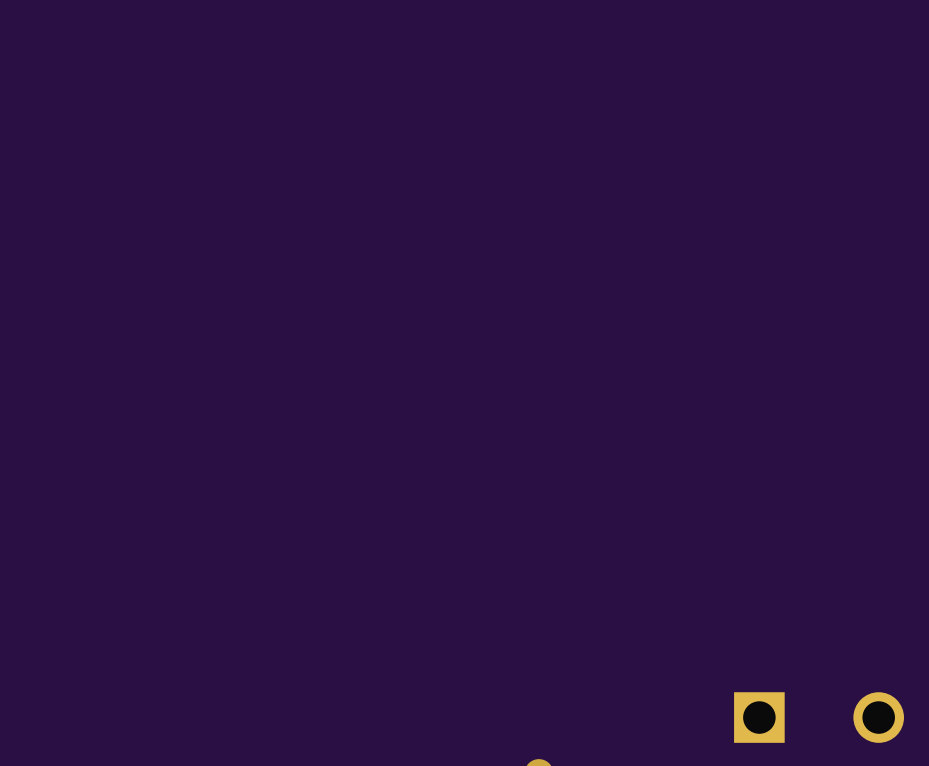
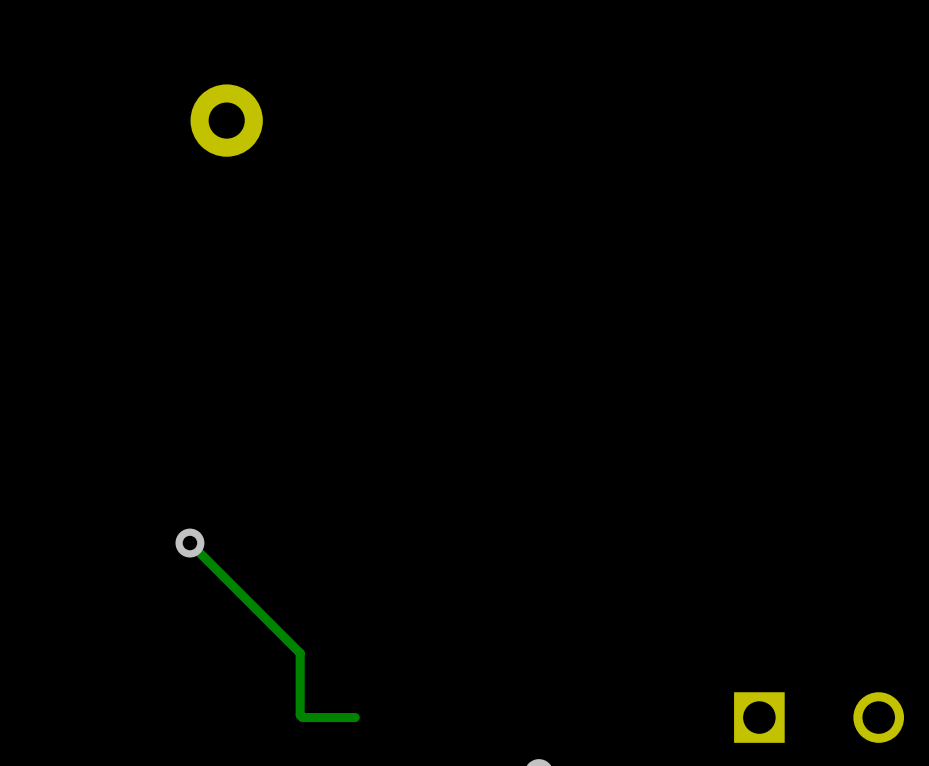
part: none -> (226, 120)
track: none -> (189, 543) (300, 653) (300, 714) (302, 717) (355, 717)
via: none -> (189, 543)

